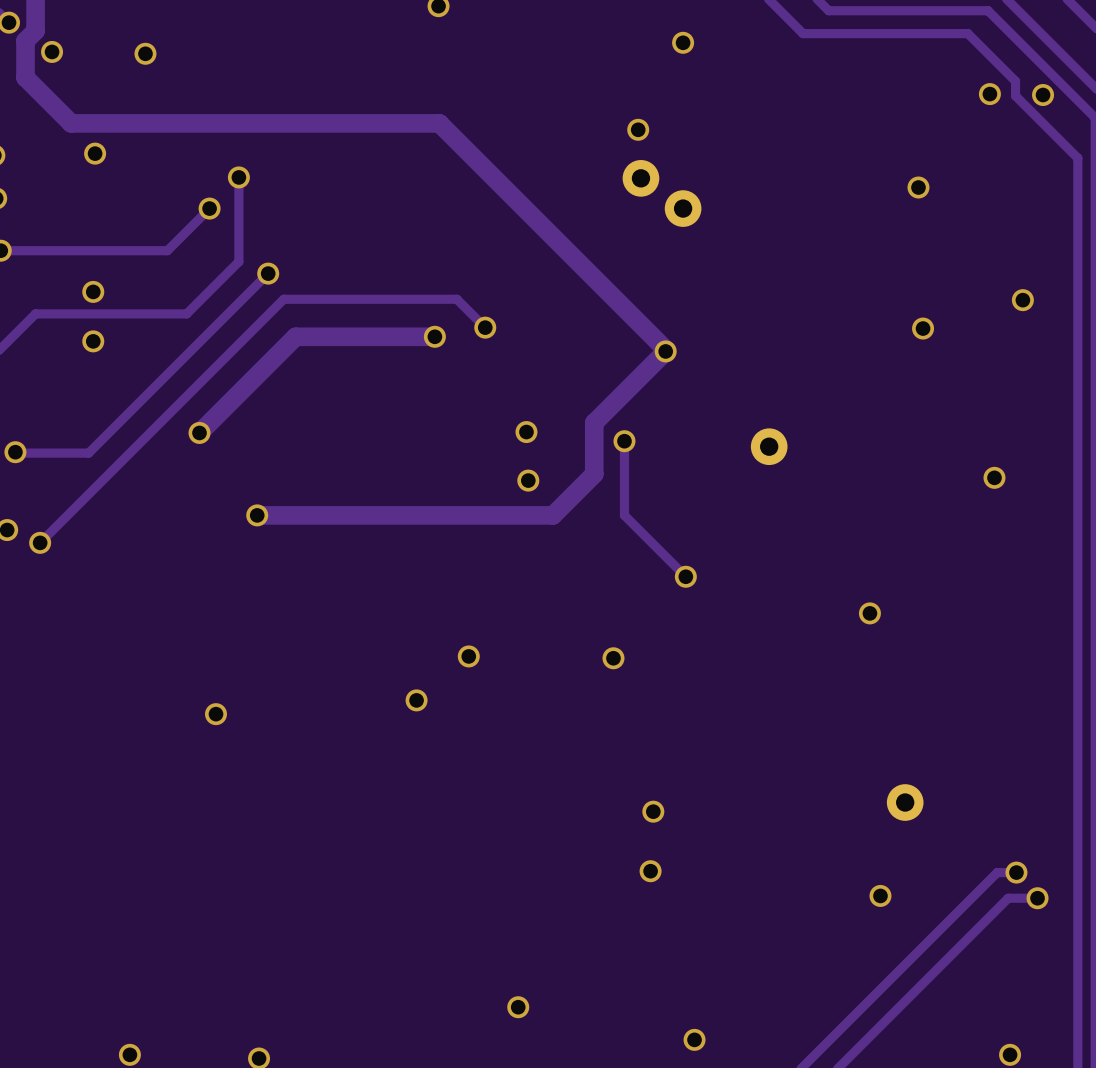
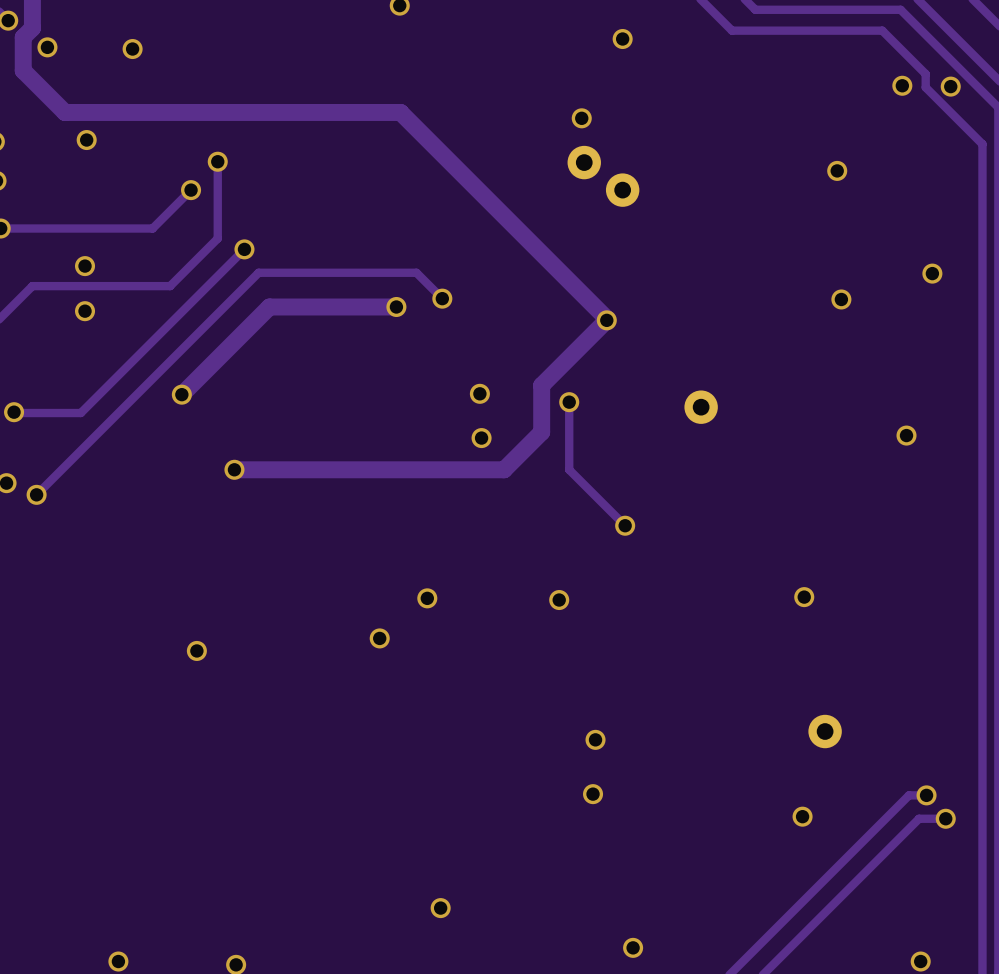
via position: (869, 613) -> (804, 597)
via position: (518, 1007) -> (440, 908)

